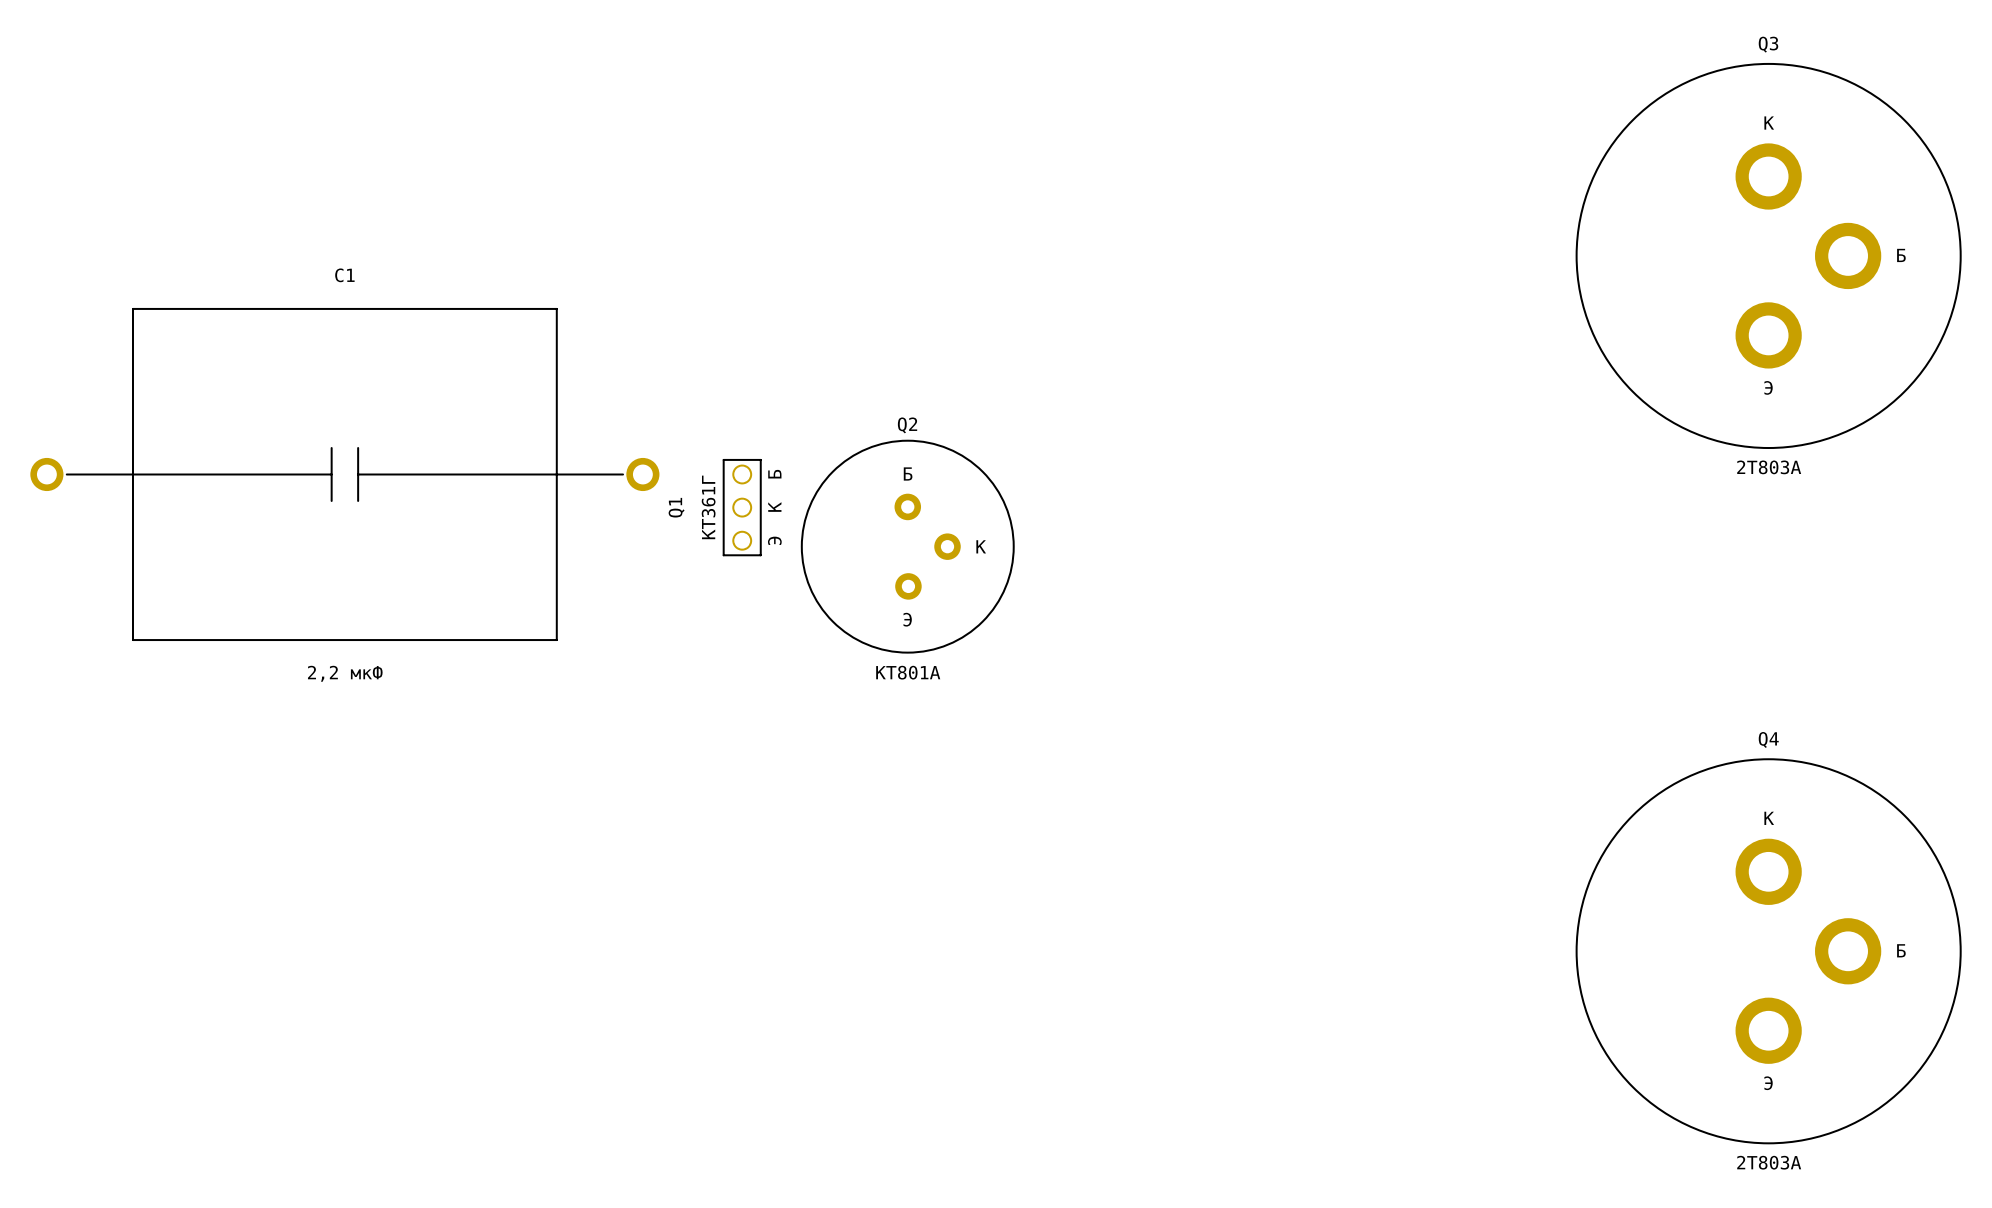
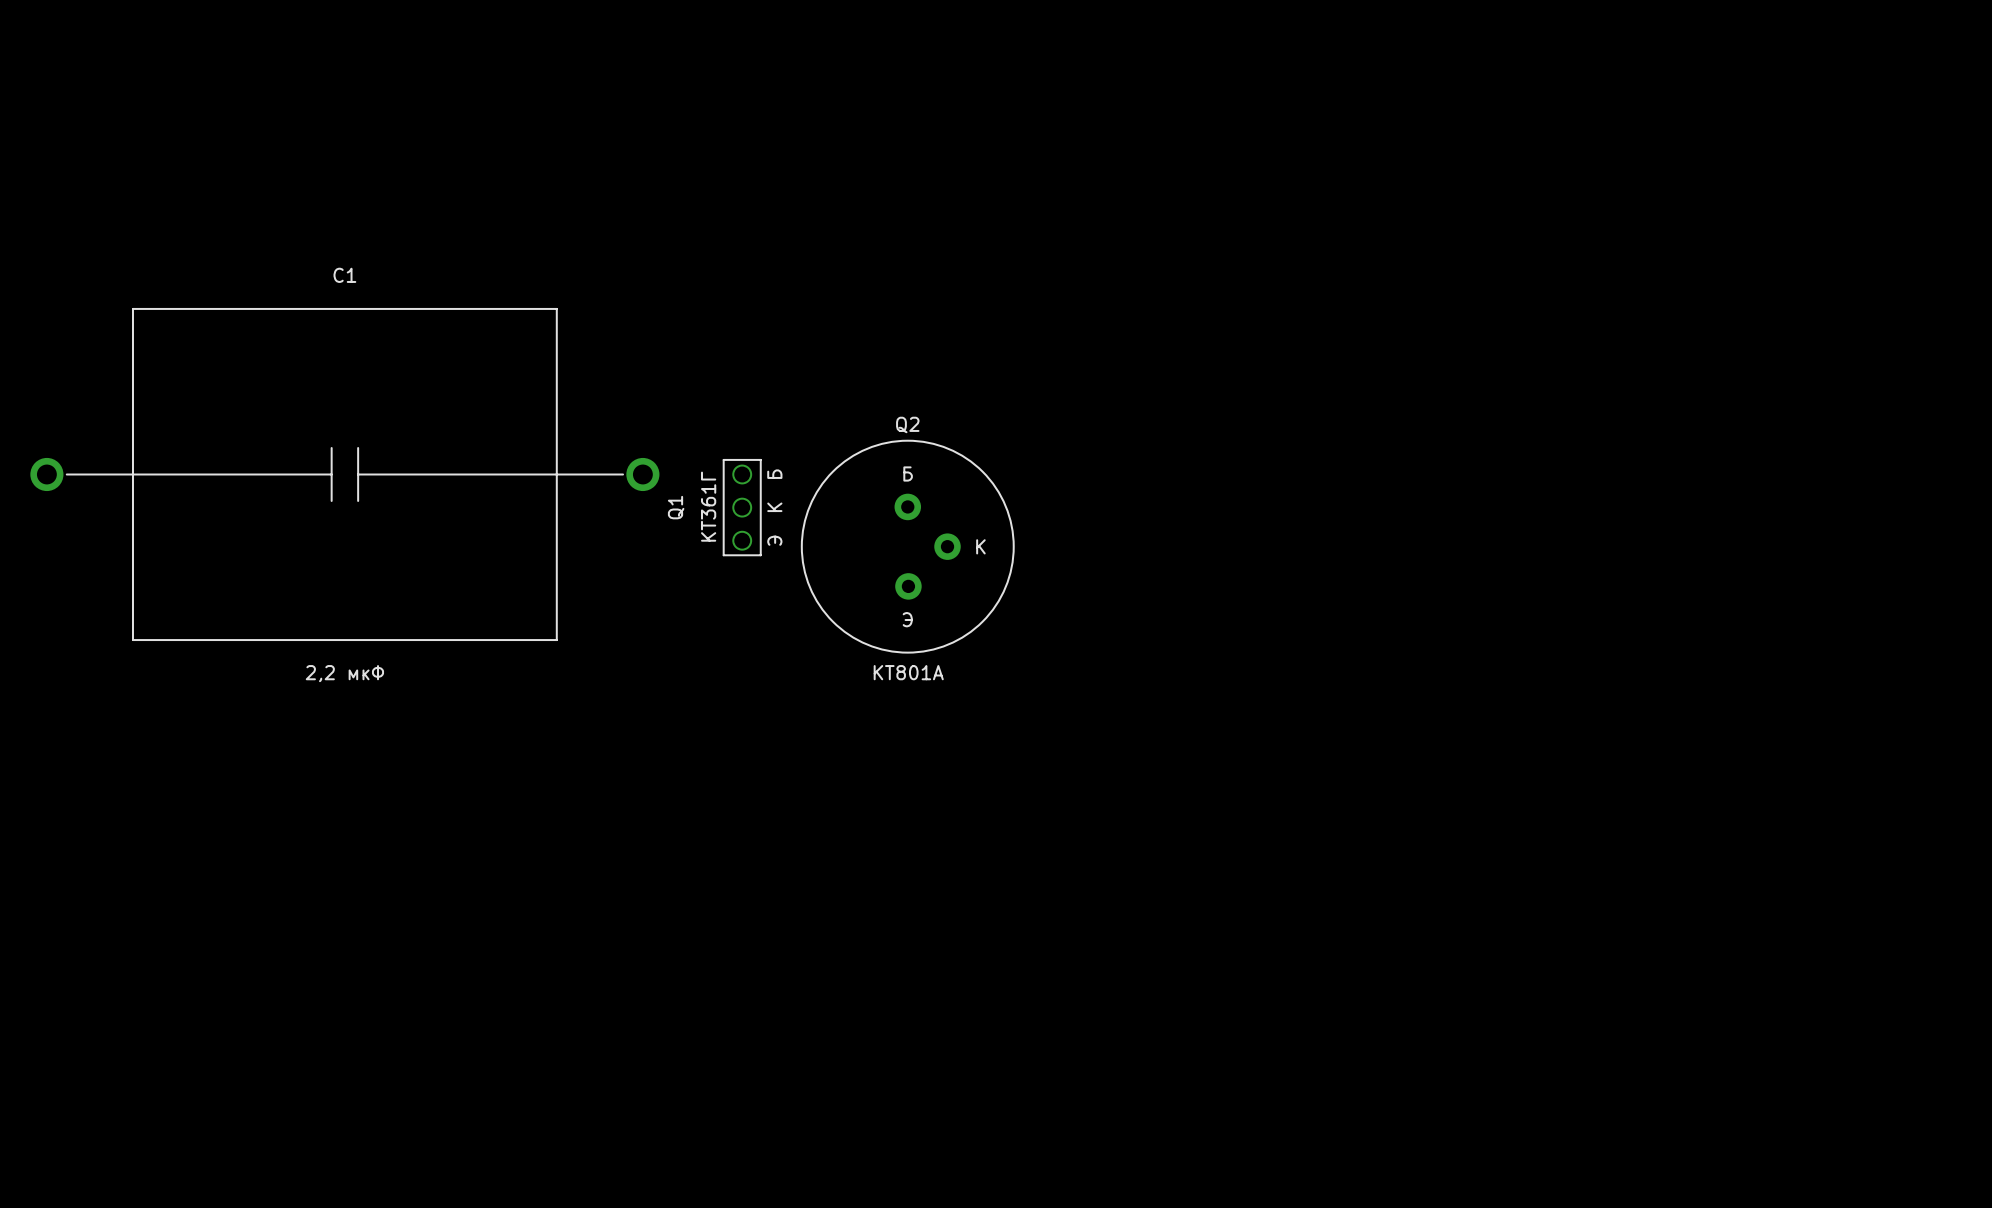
Q3: 2Т803А (1768, 255) -> none
Q4: 2Т803А (1768, 951) -> none

